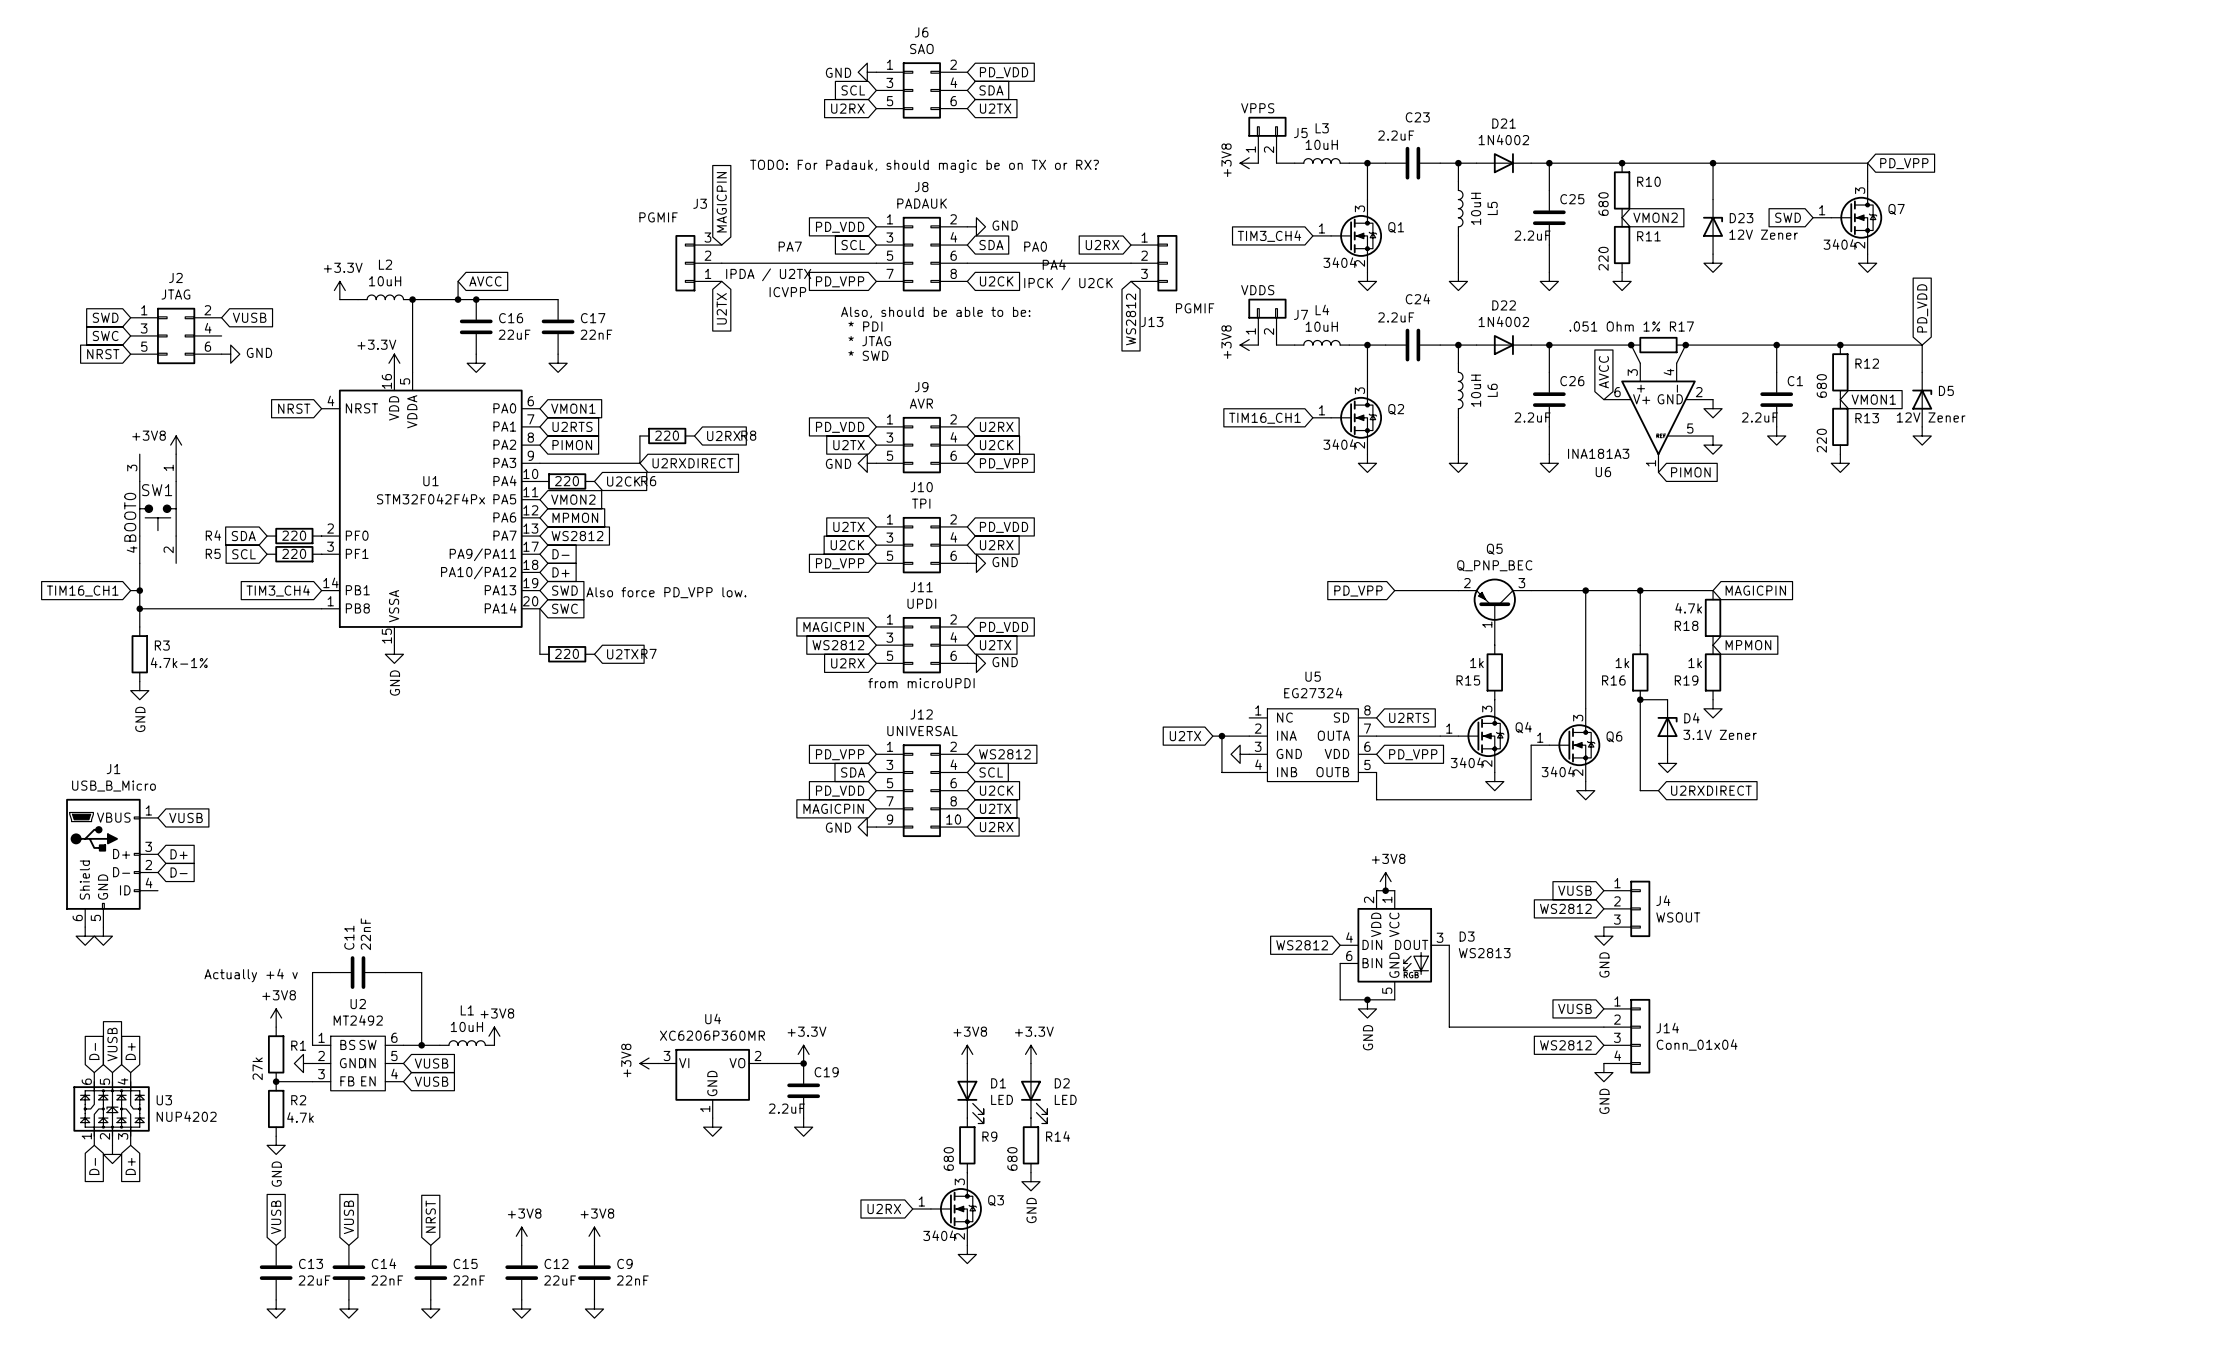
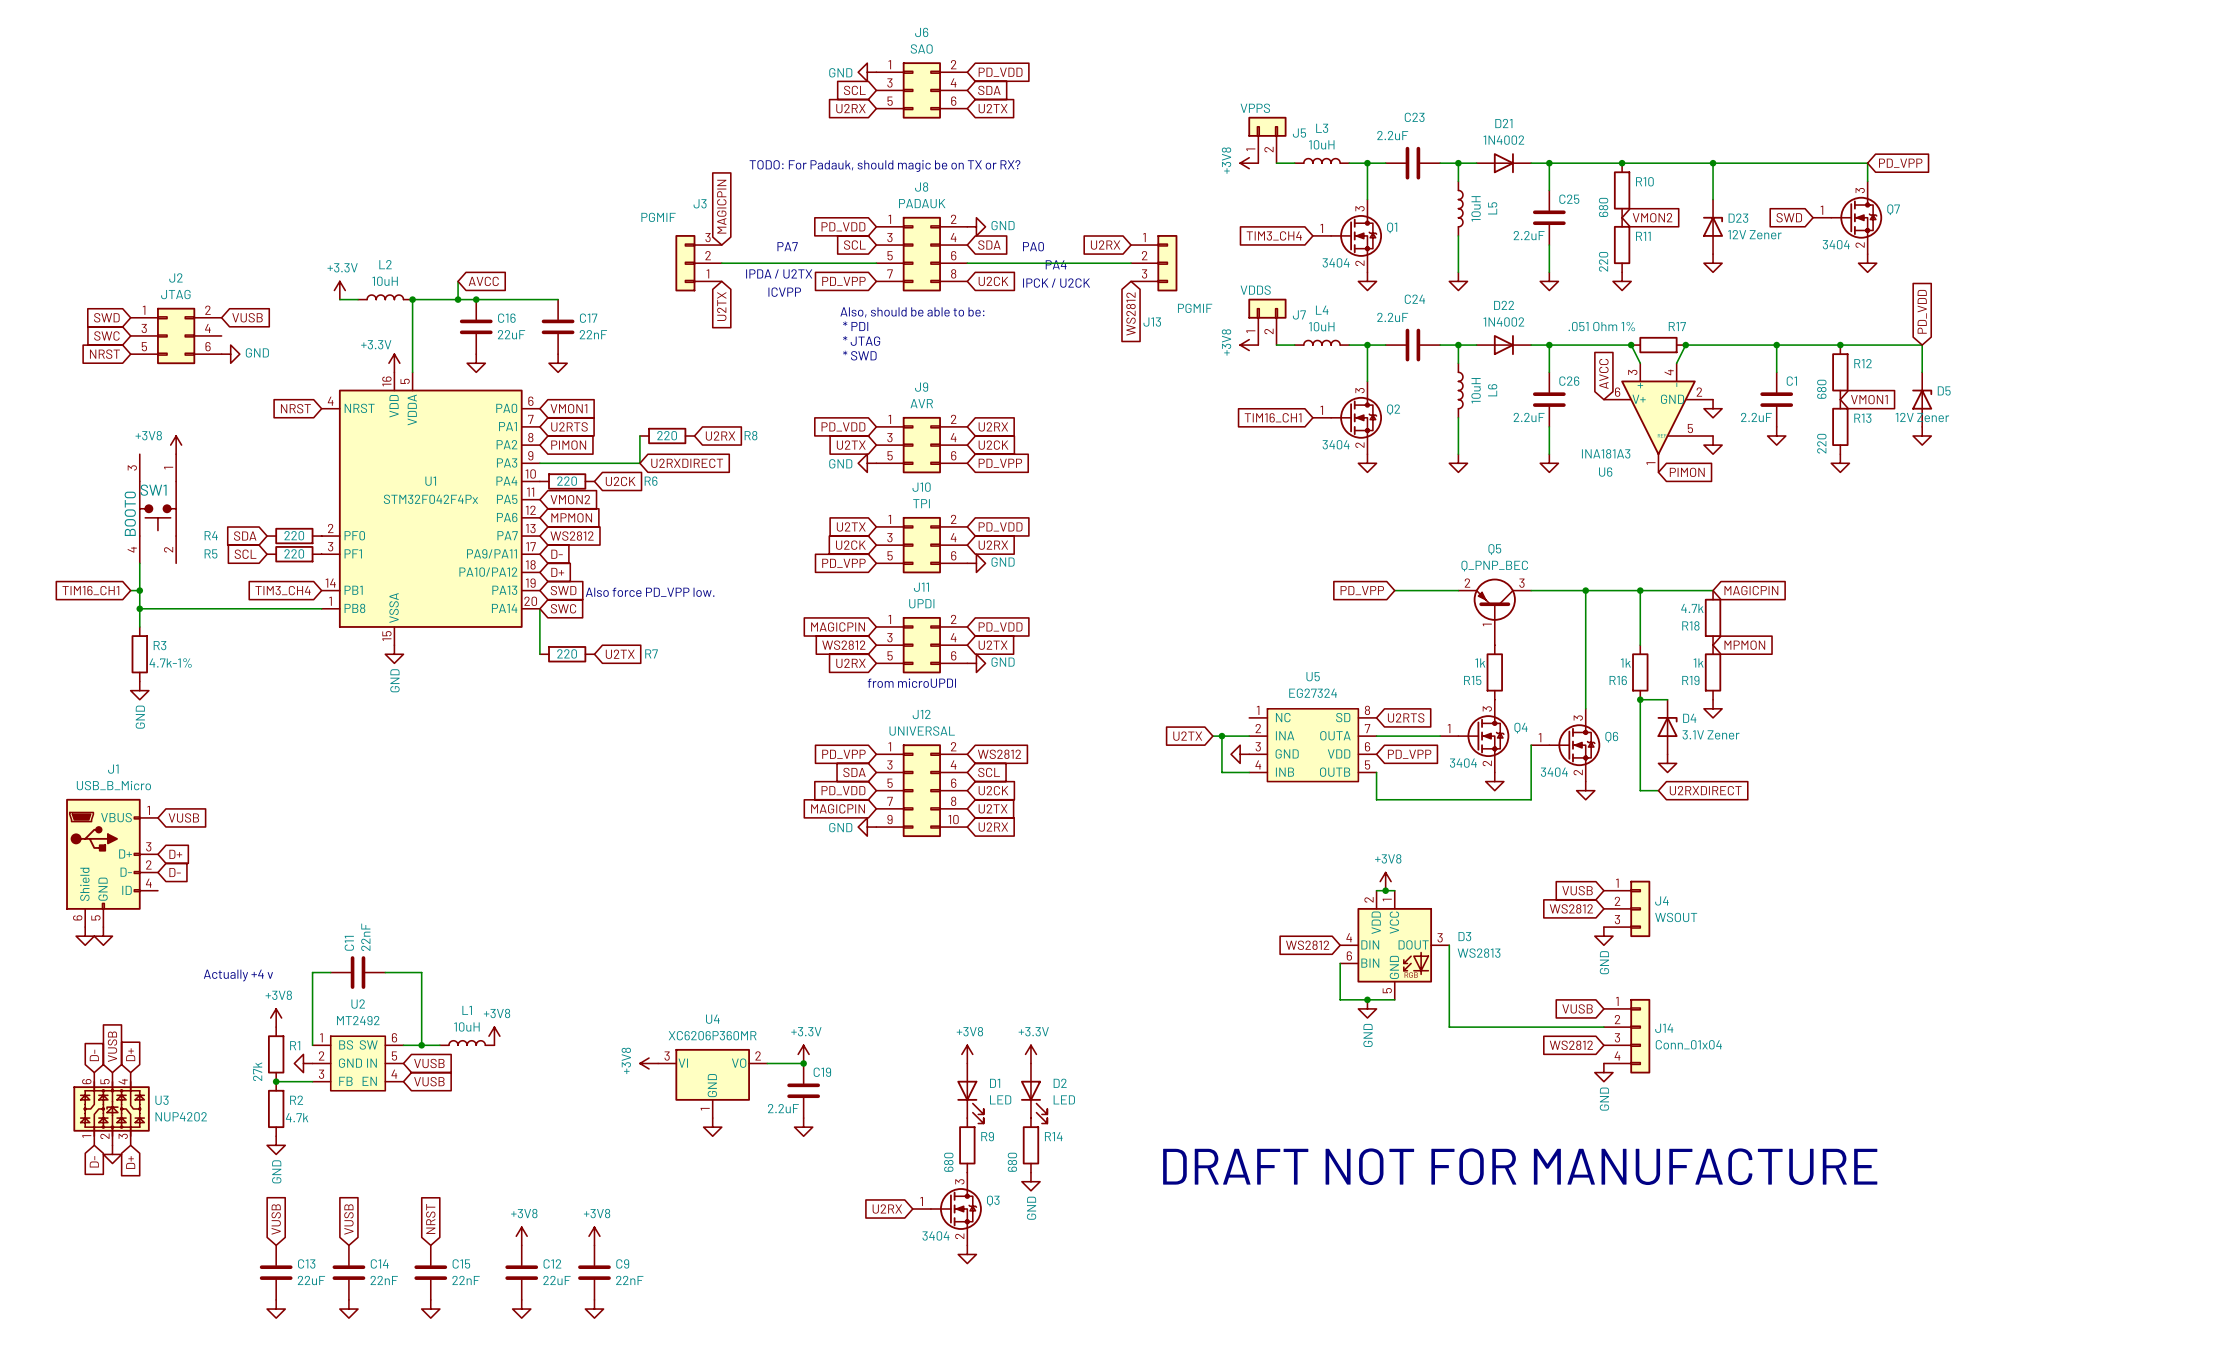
text: none -> DRAFT NOT FOR MANUFACTURE (1520, 1166)

